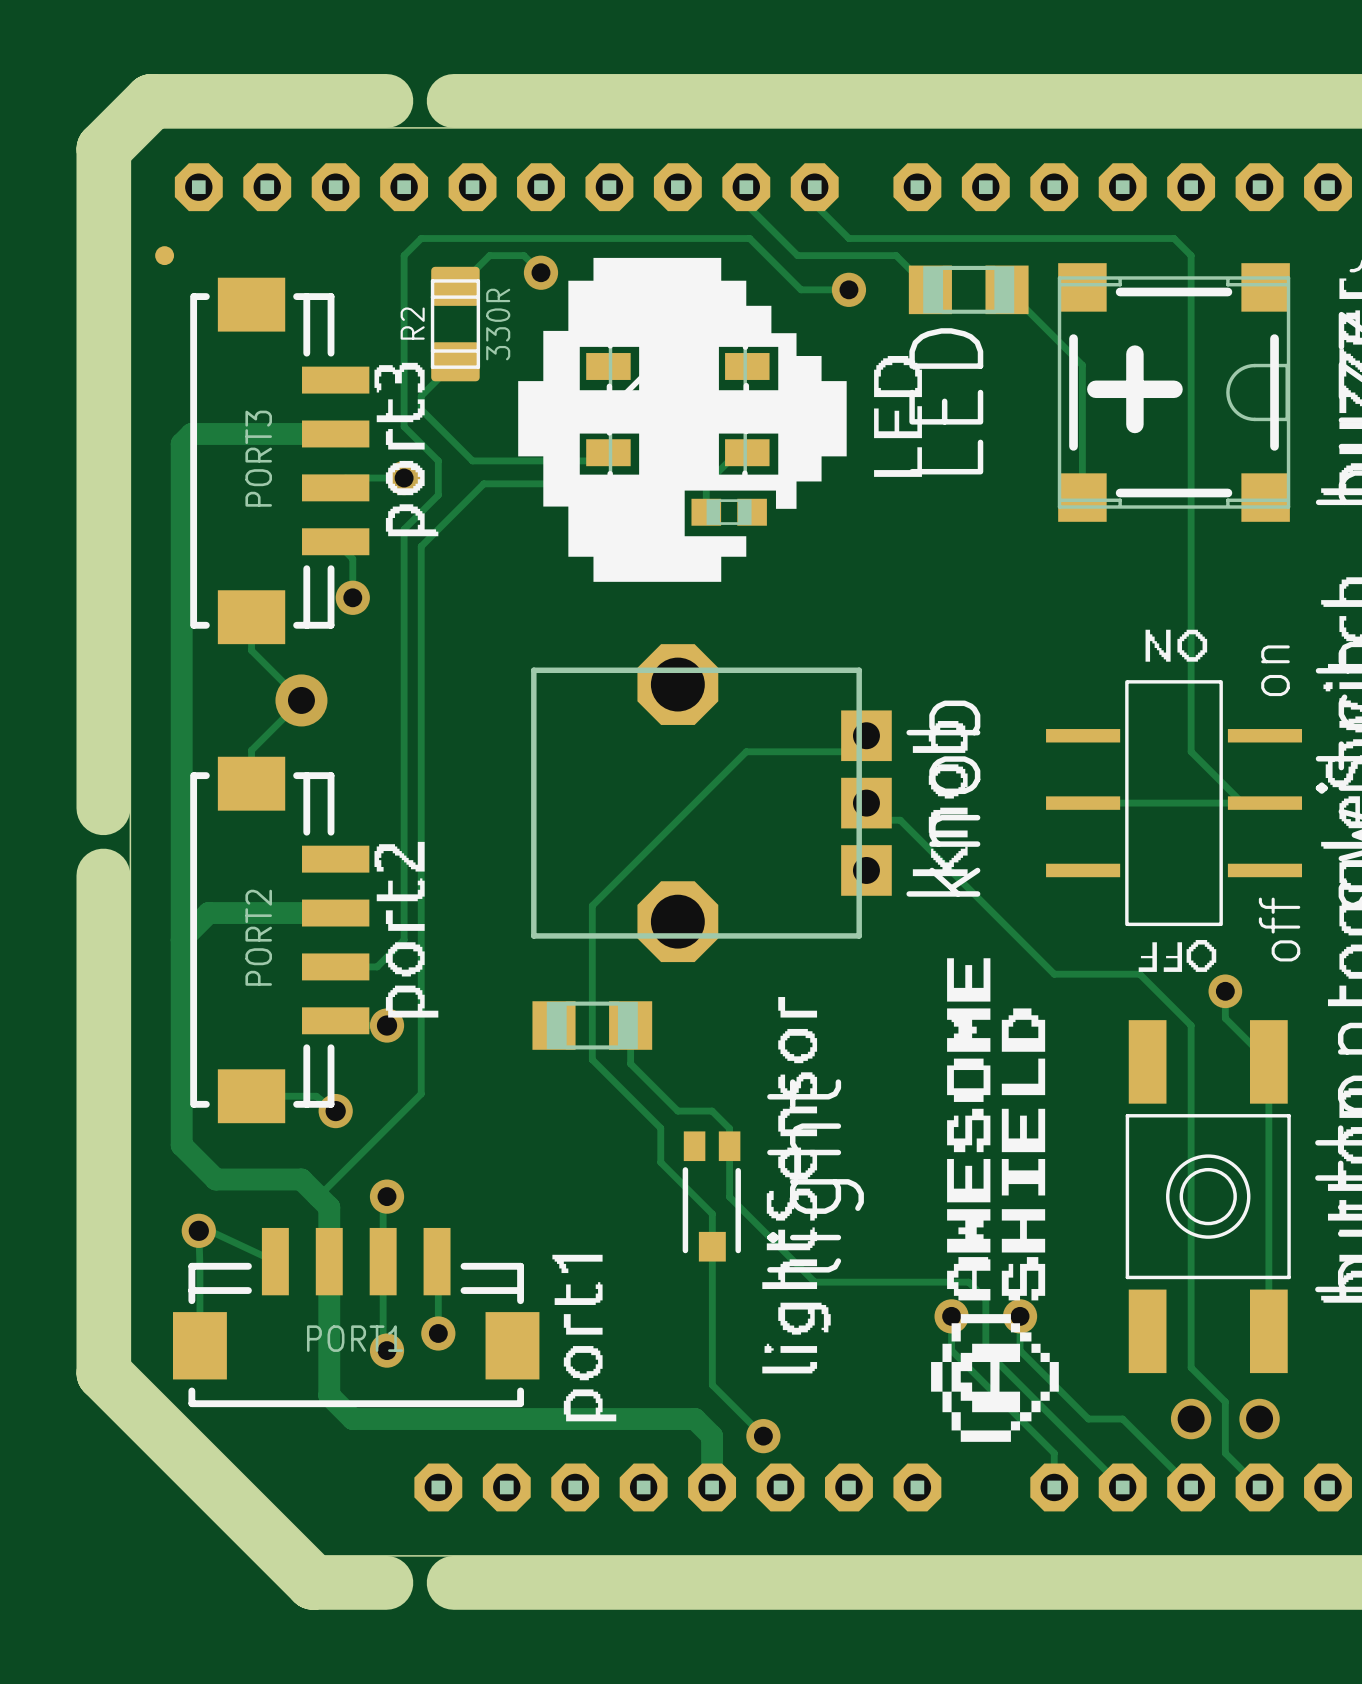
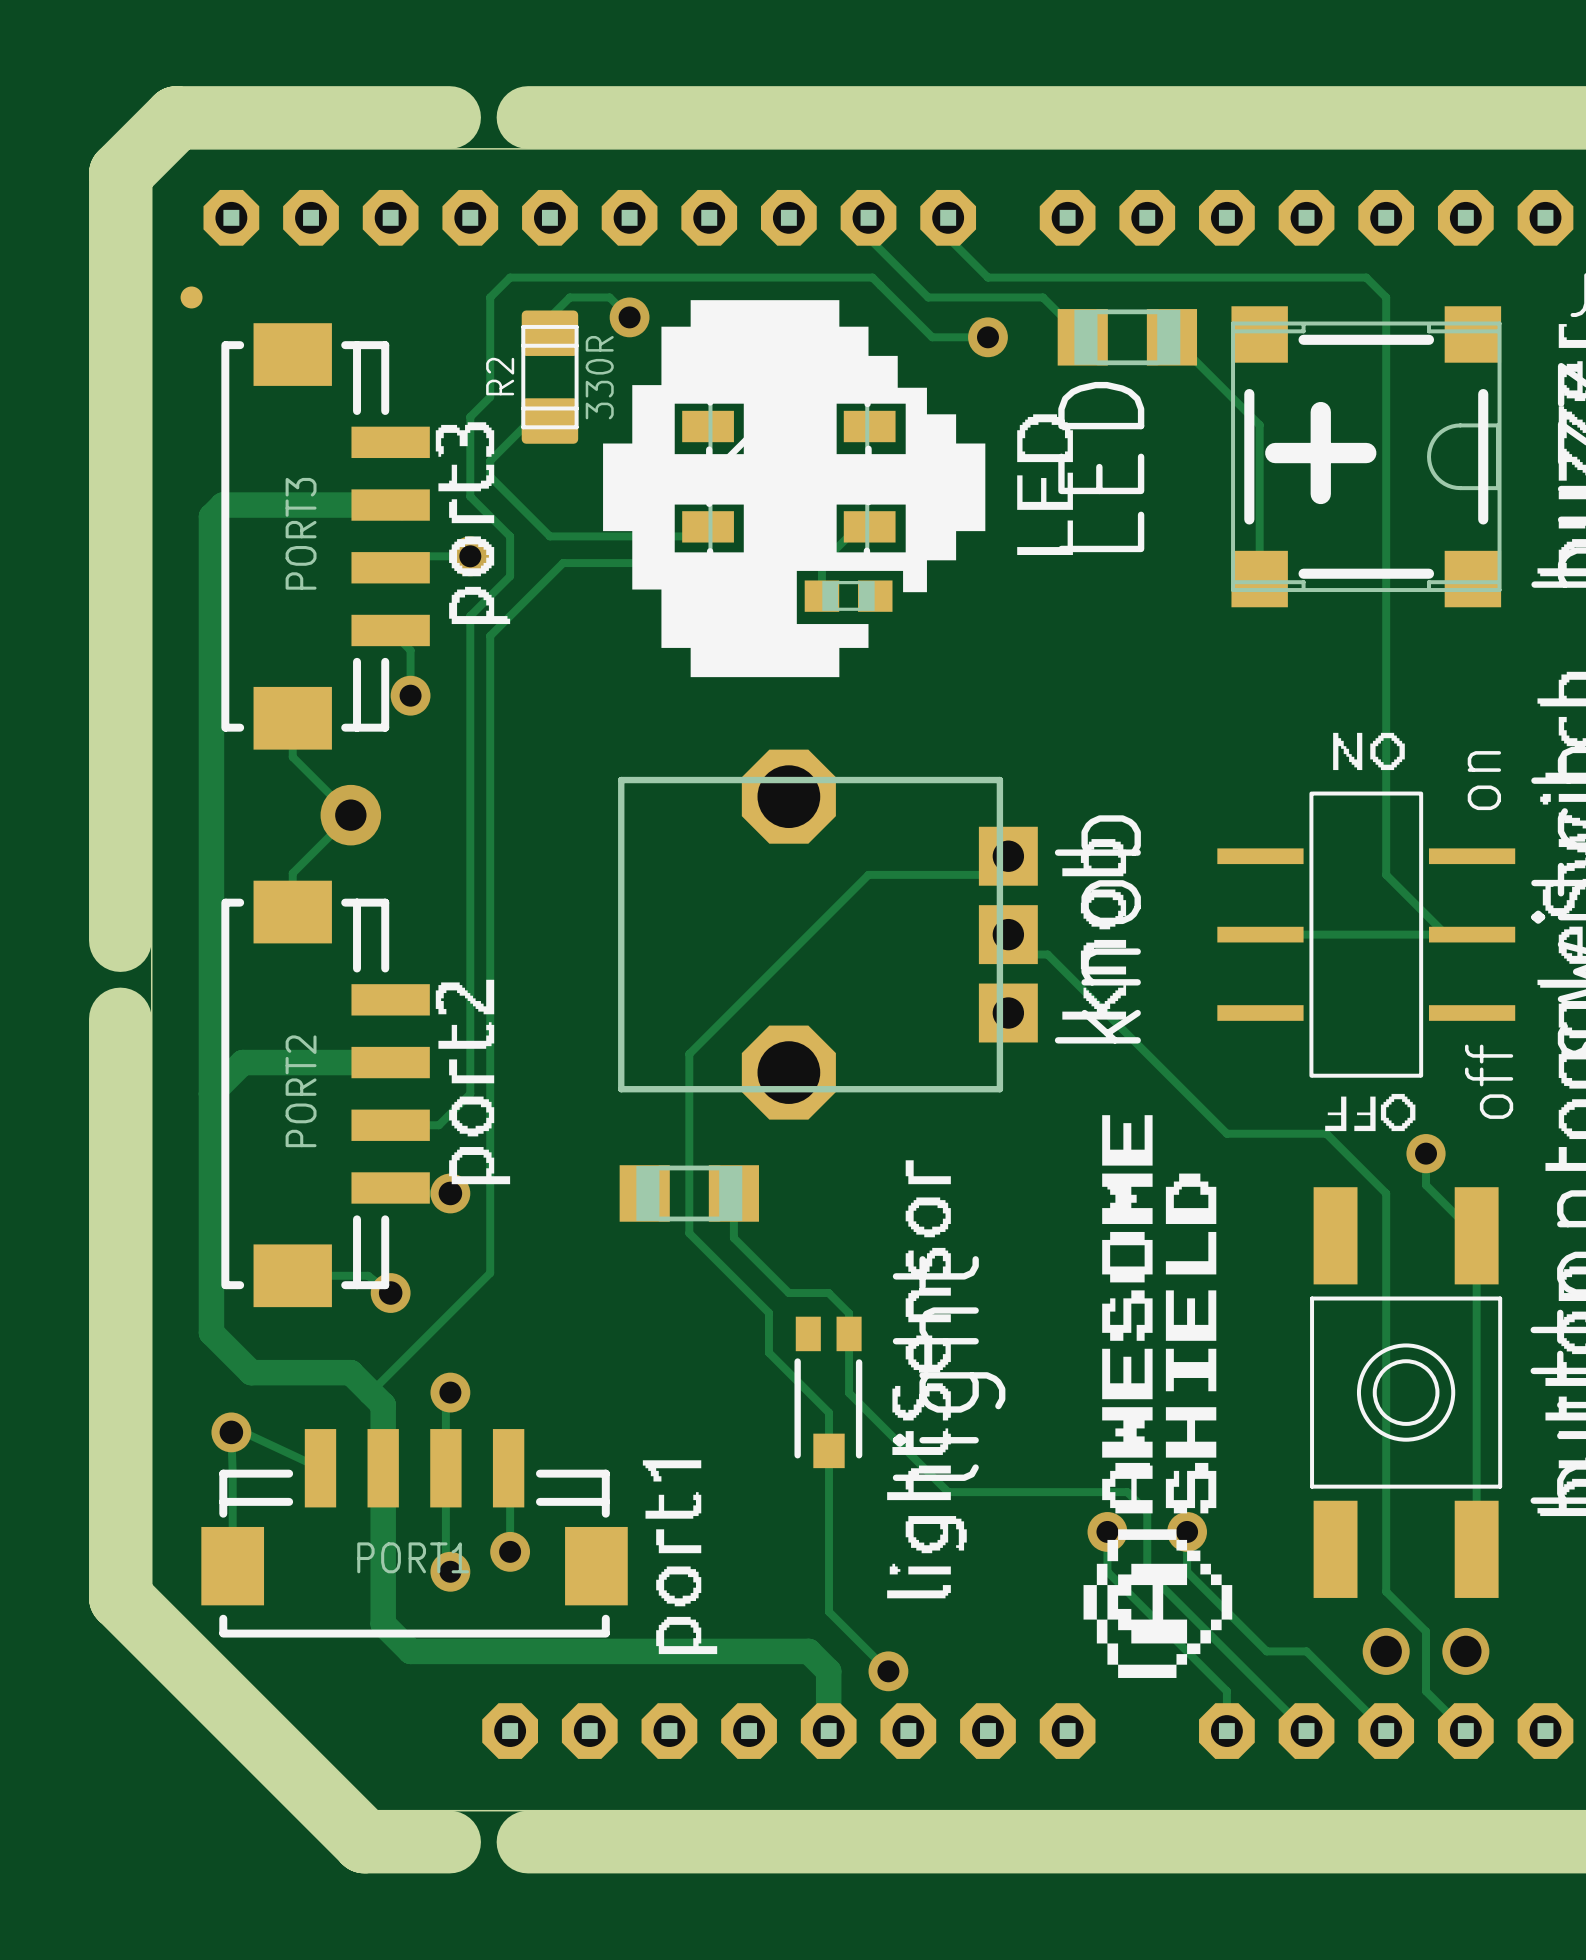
track: (438, 238) (421, 238) (404, 255) (404, 358) -> (510, 277) (490, 297) (490, 397) (470, 416)
R2 position: (455, 324) -> (549, 377)

